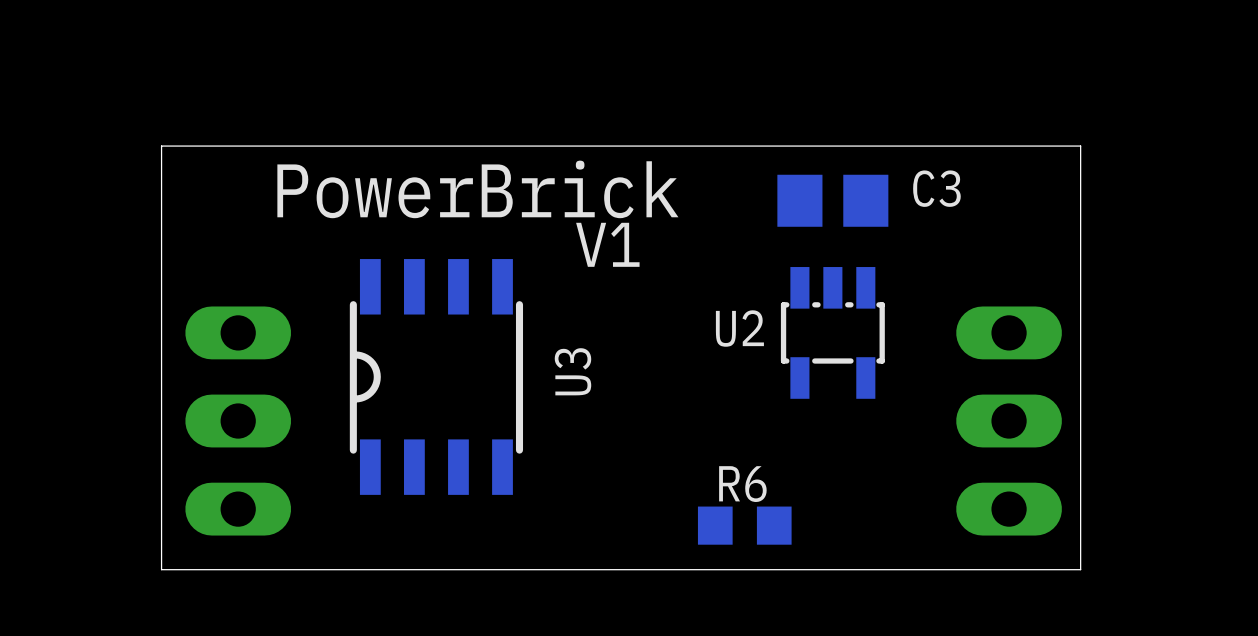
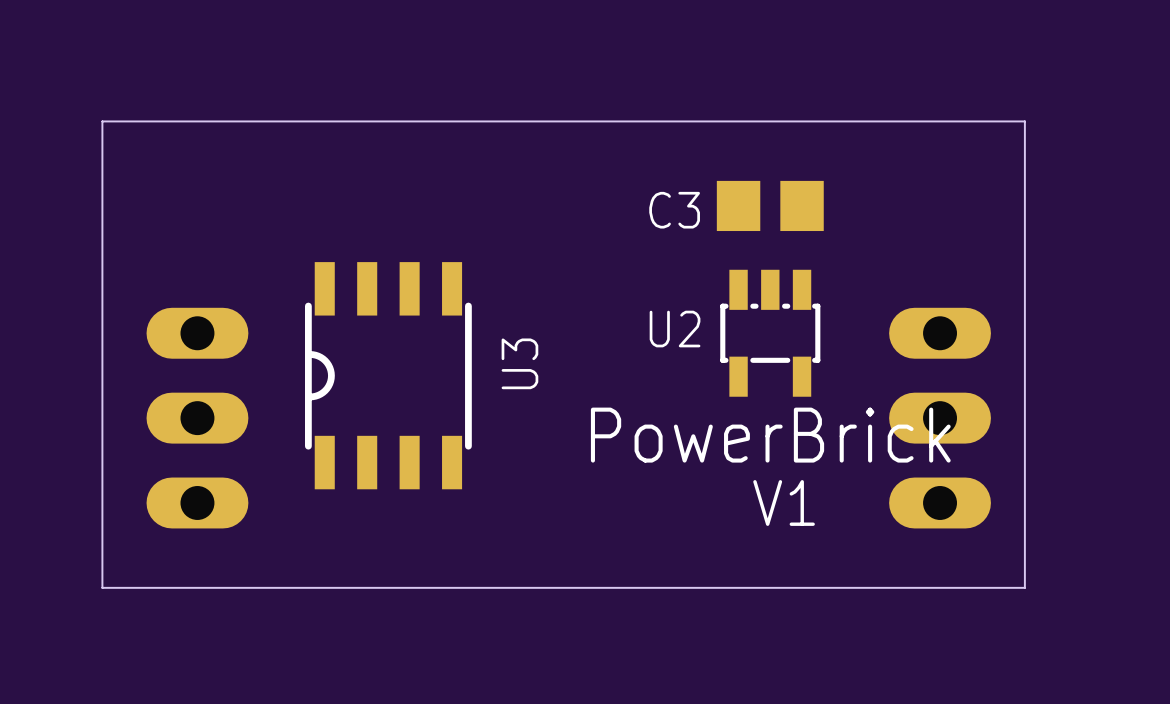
board edge: (1080, 146) (161, 146) (161, 569) (1080, 569) (1080, 146) -> (1024, 121) (1024, 587) (102, 587) (102, 121) (1024, 121)
C3 name position: C3 (936, 188) -> C3 (674, 210)
text position: PowerBrick (477, 189) -> PowerBrick (770, 435)
text position: V1 (607, 244) -> V1 (784, 502)
R6: (744, 525) -> none

